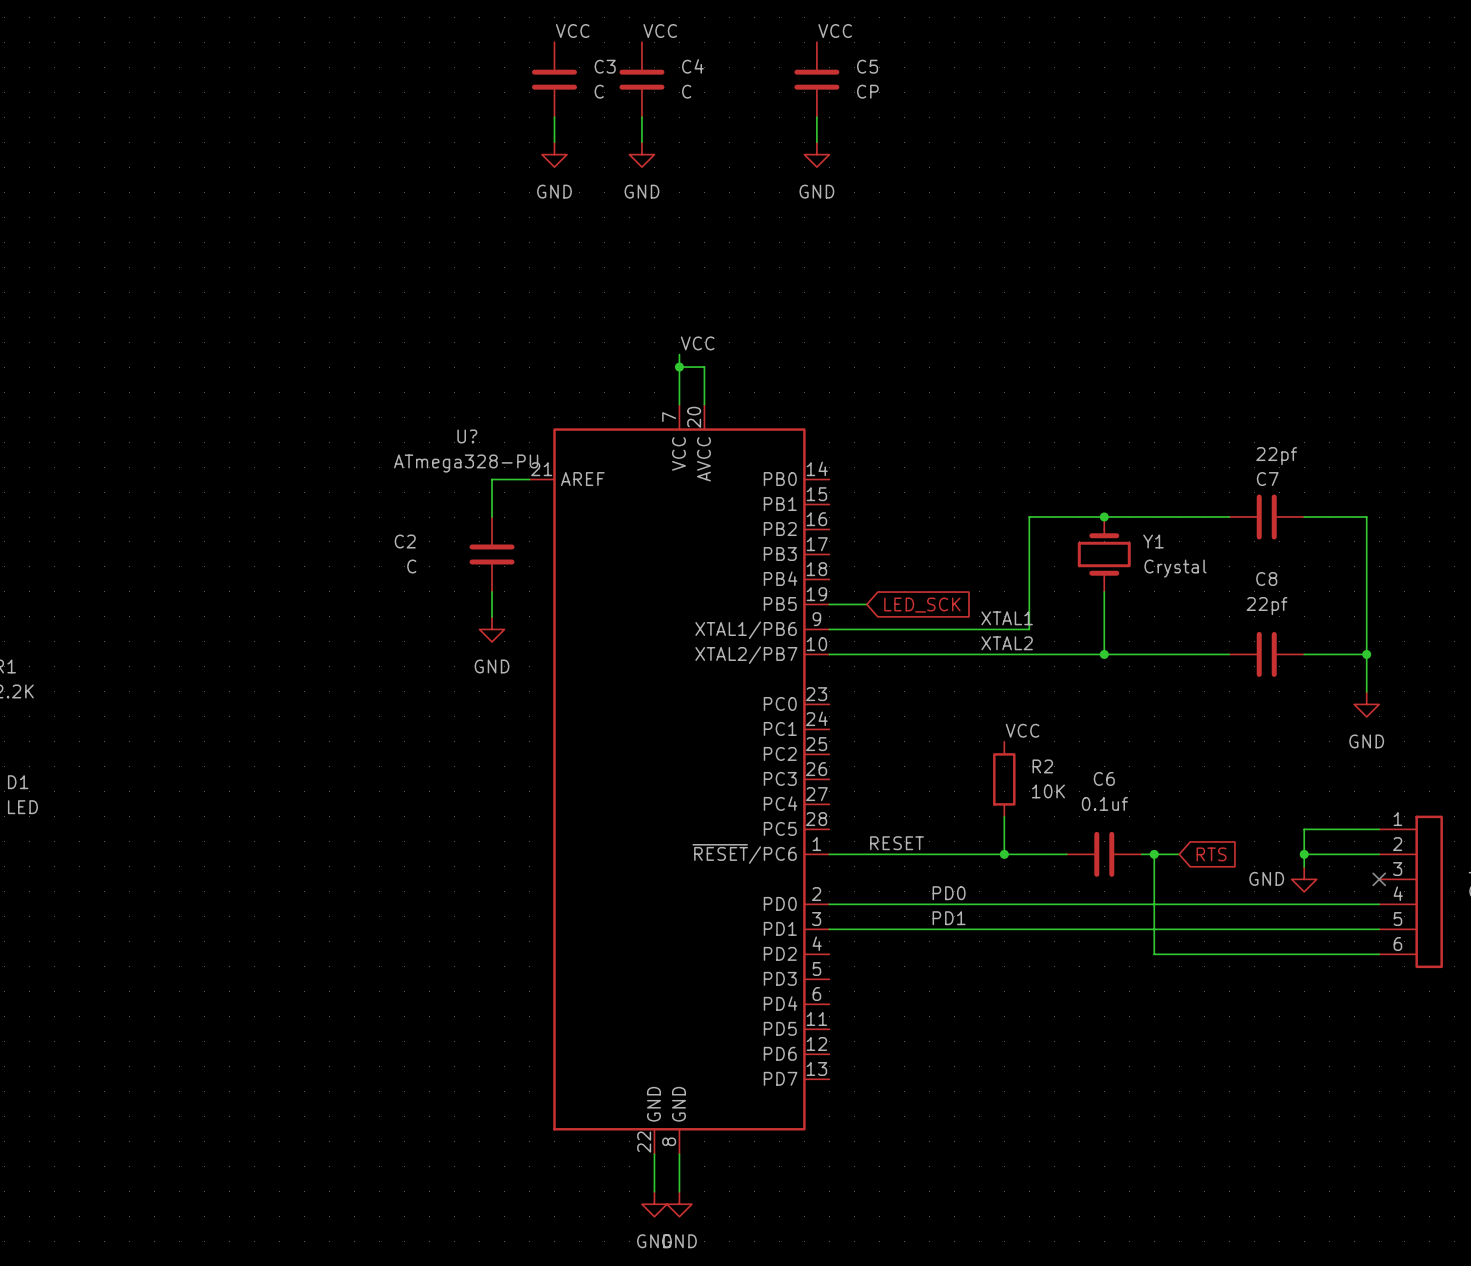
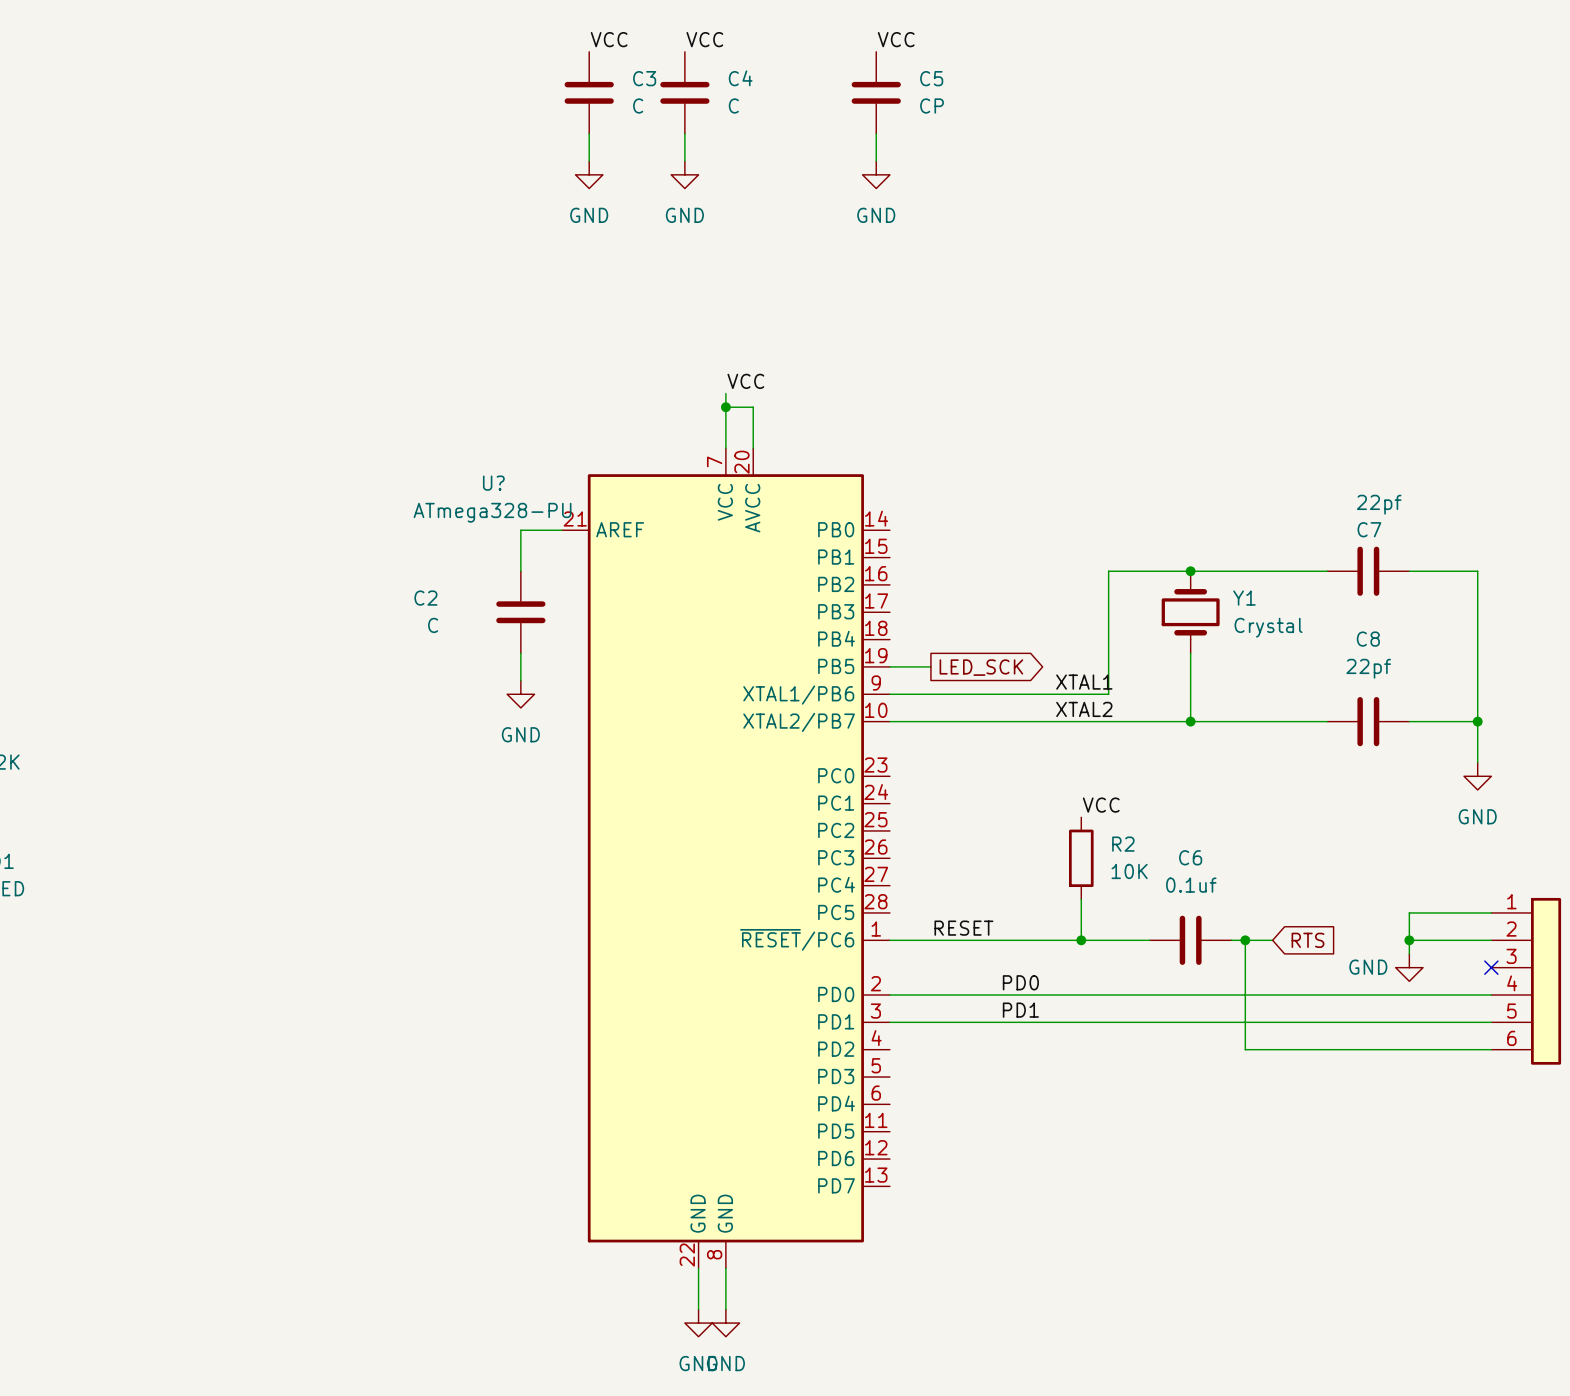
global label shape: input (922, 605) -> output (981, 667)

